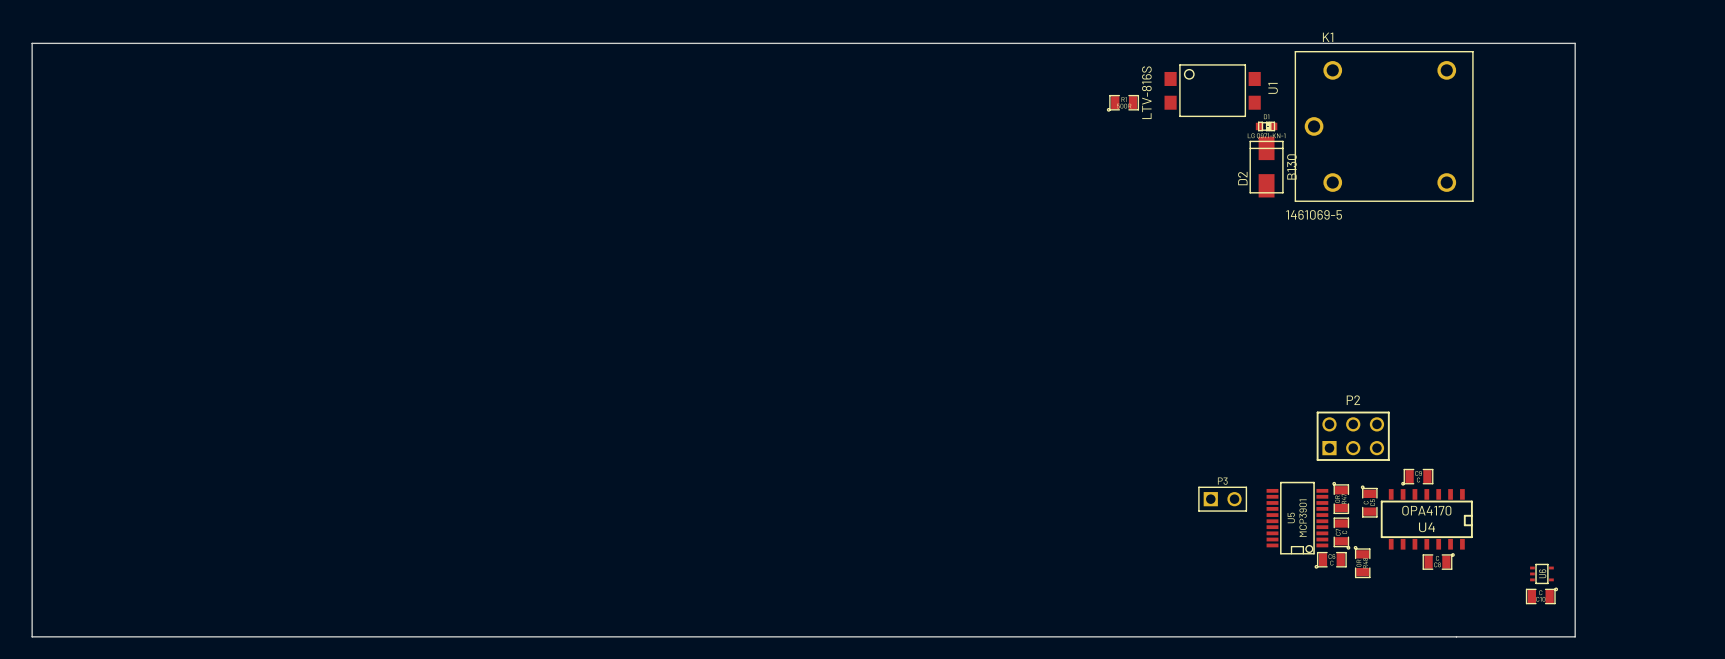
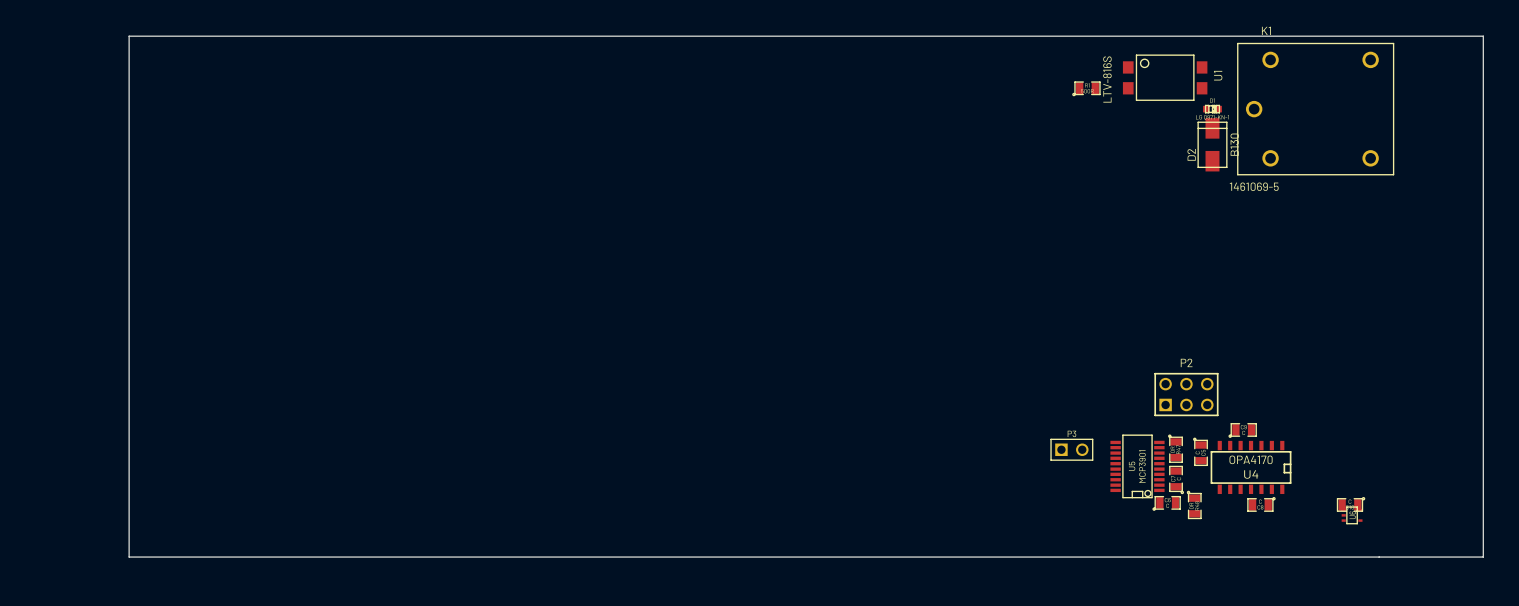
board edge: (32, 43) (1575, 43) (1575, 636) (32, 636) (32, 43) -> (129, 36) (1483, 36) (1483, 557) (129, 557) (129, 36)
U1 position: (1212, 90) -> (1165, 77)
part position: (1122, 103) -> (1086, 88)
part position: (1266, 126) -> (1212, 109)
K1 position: (1384, 126) -> (1315, 109)
D2 position: (1266, 167) -> (1212, 144)
part position: (1541, 595) -> (1351, 504)

